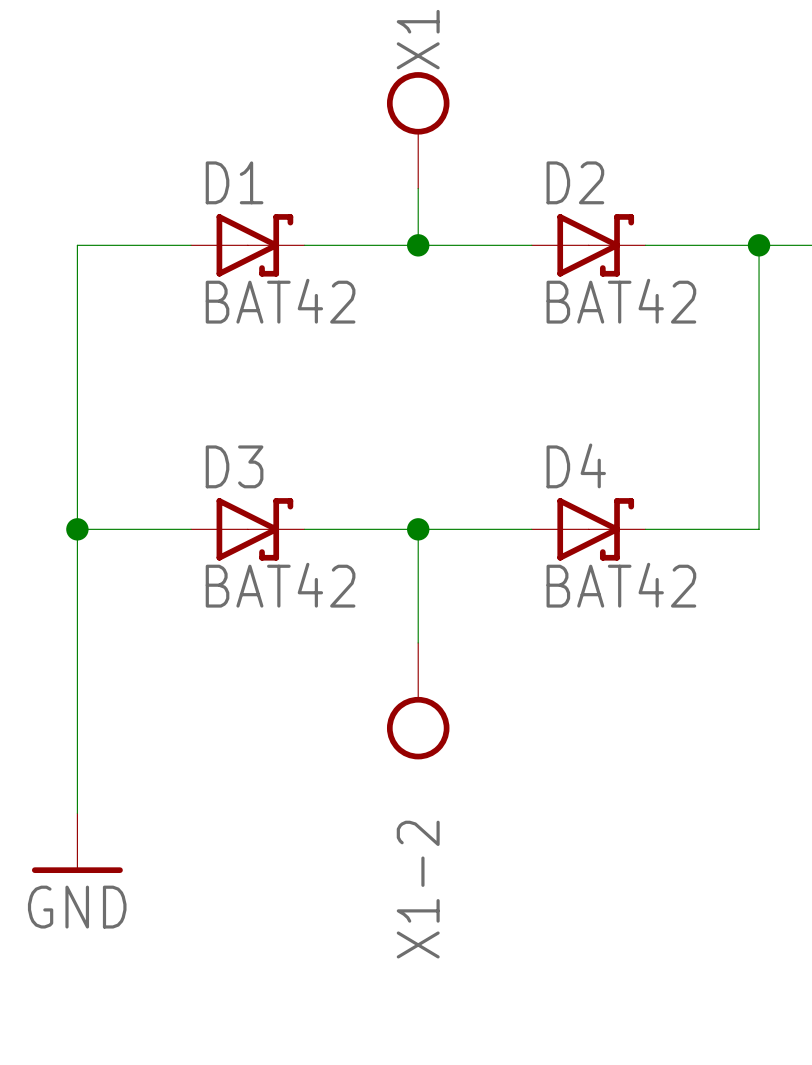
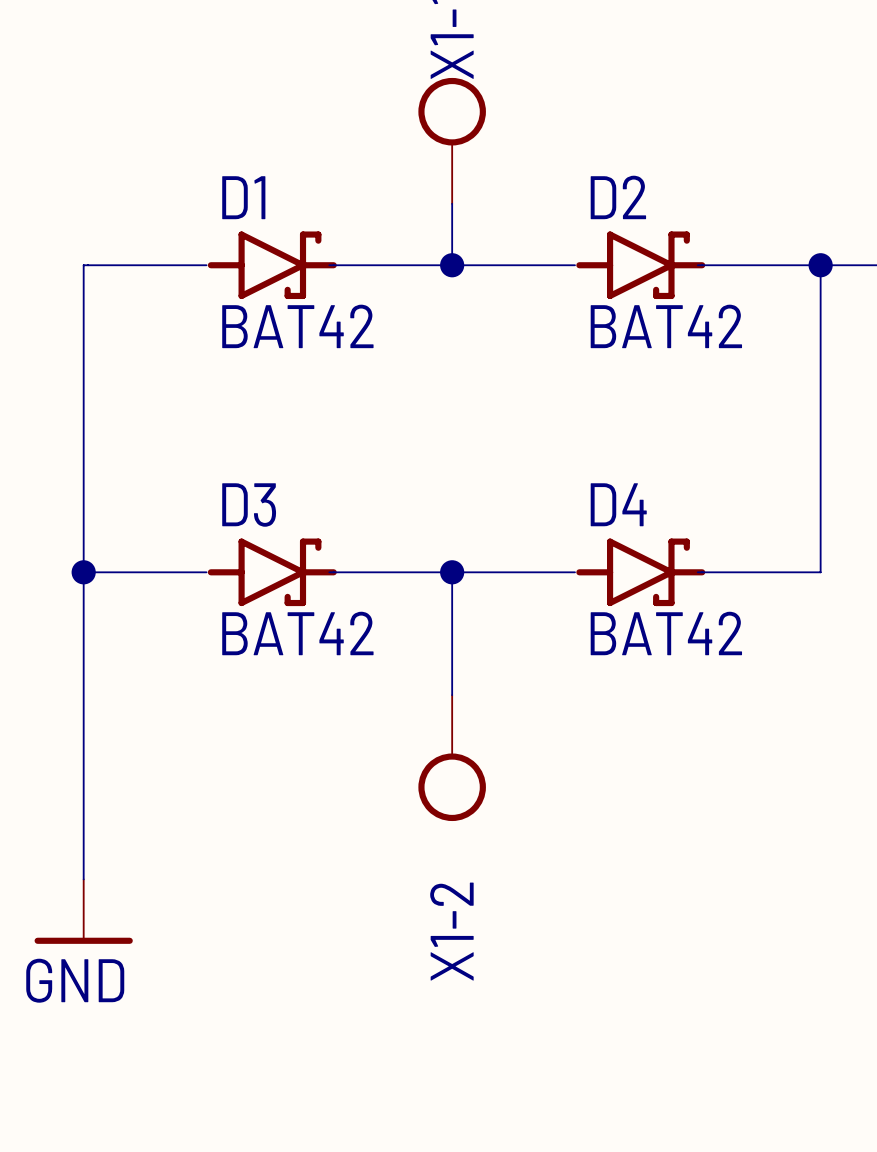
D1 symbol: [191, 214, 305, 277] -> [207, 231, 337, 300]
D2 symbol: [531, 214, 646, 277] -> [576, 231, 706, 300]
D3 symbol: [191, 498, 305, 561] -> [207, 538, 337, 607]
D4 symbol: [531, 498, 646, 561] -> [576, 538, 706, 607]

